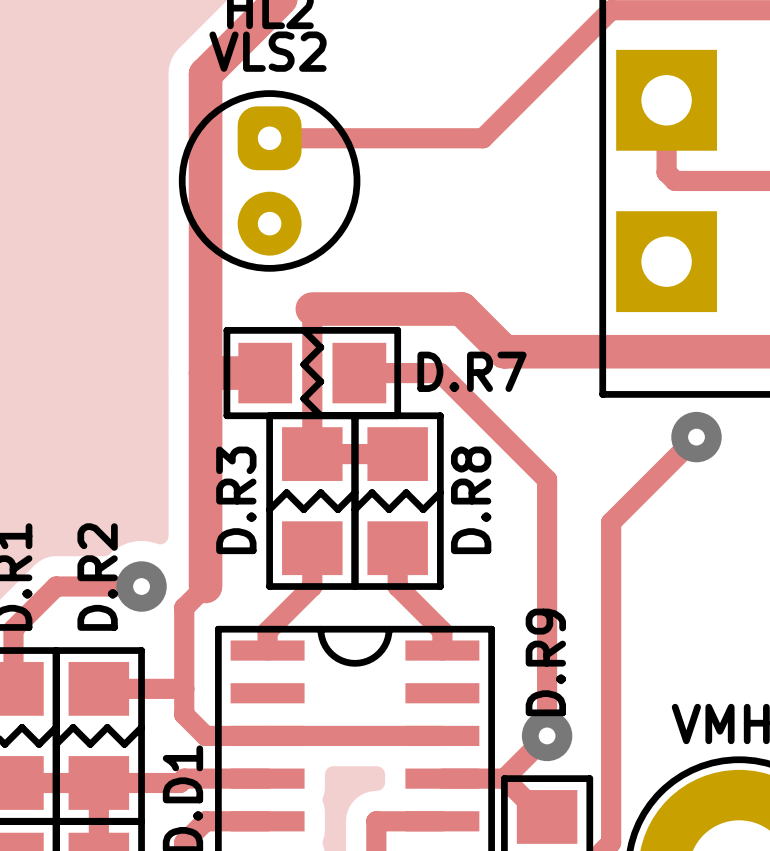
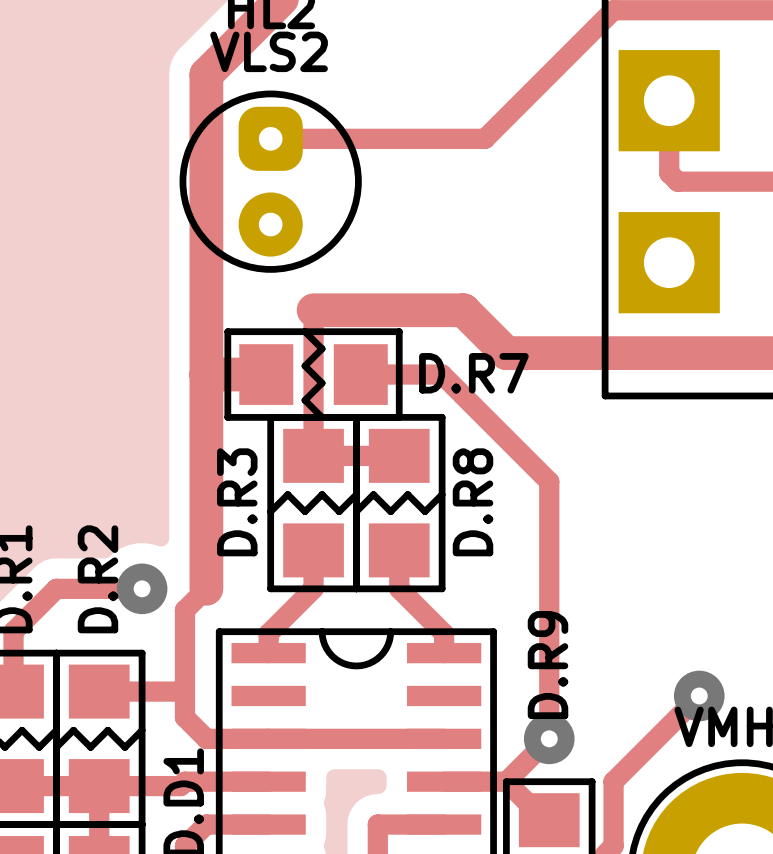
track: (696, 437) (611, 522) (611, 778) -> (699, 695) (613, 781)
via: (696, 437) -> none
via: none -> (699, 695)

